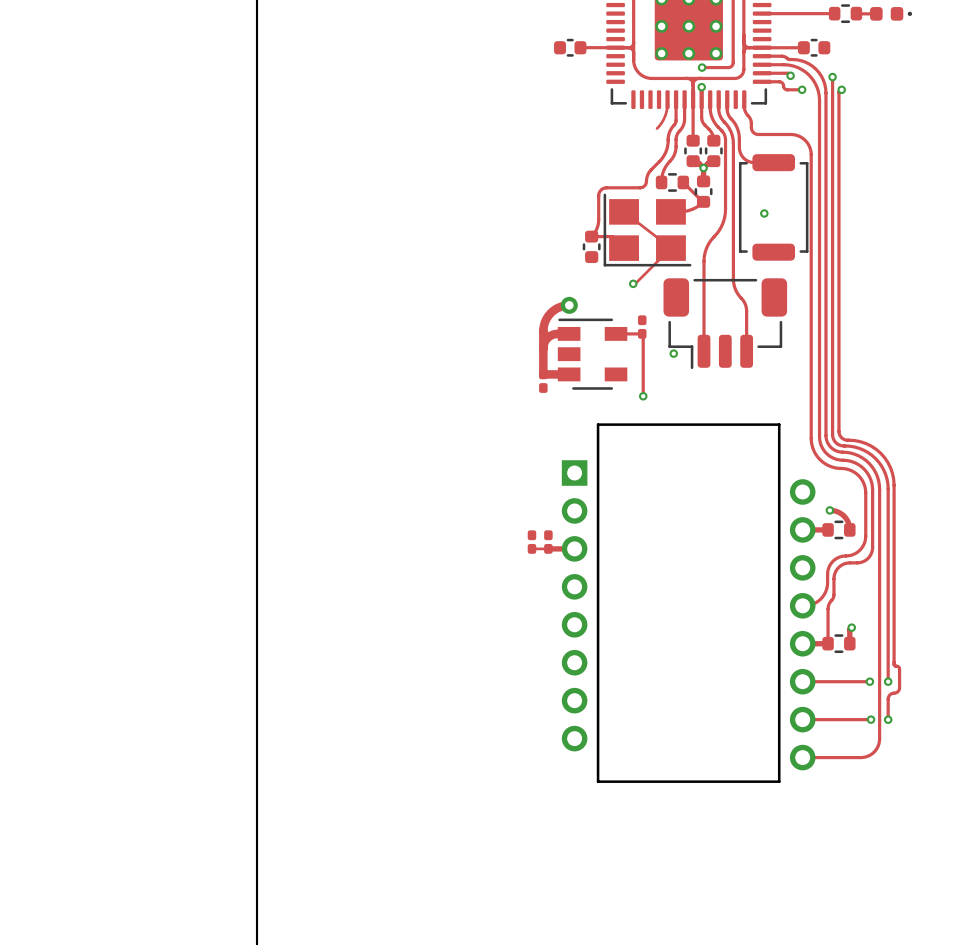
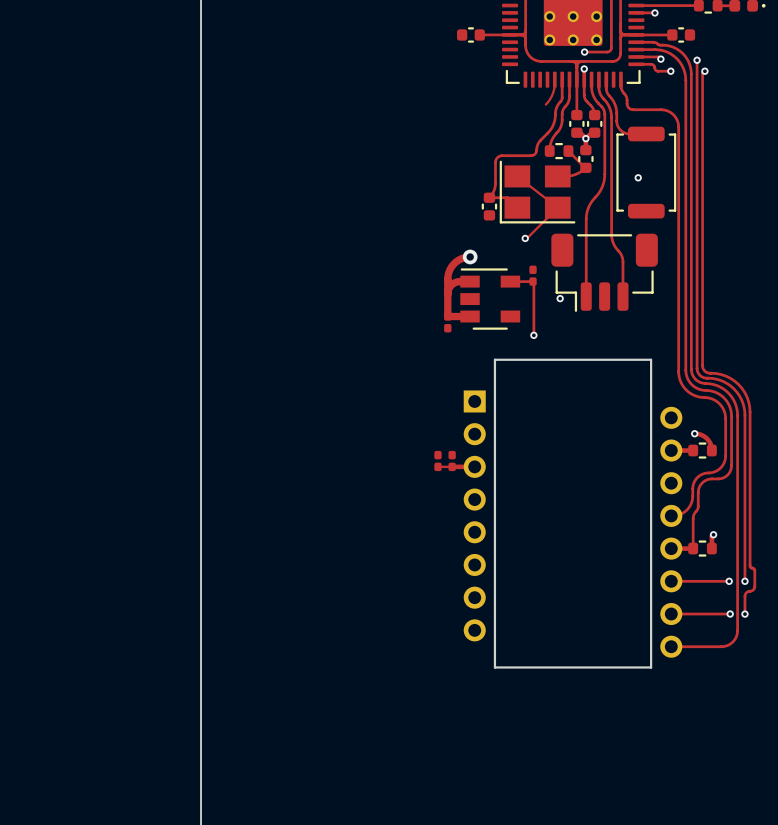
track: none -> (636, 12) (654, 12)
via: none -> (654, 12)

